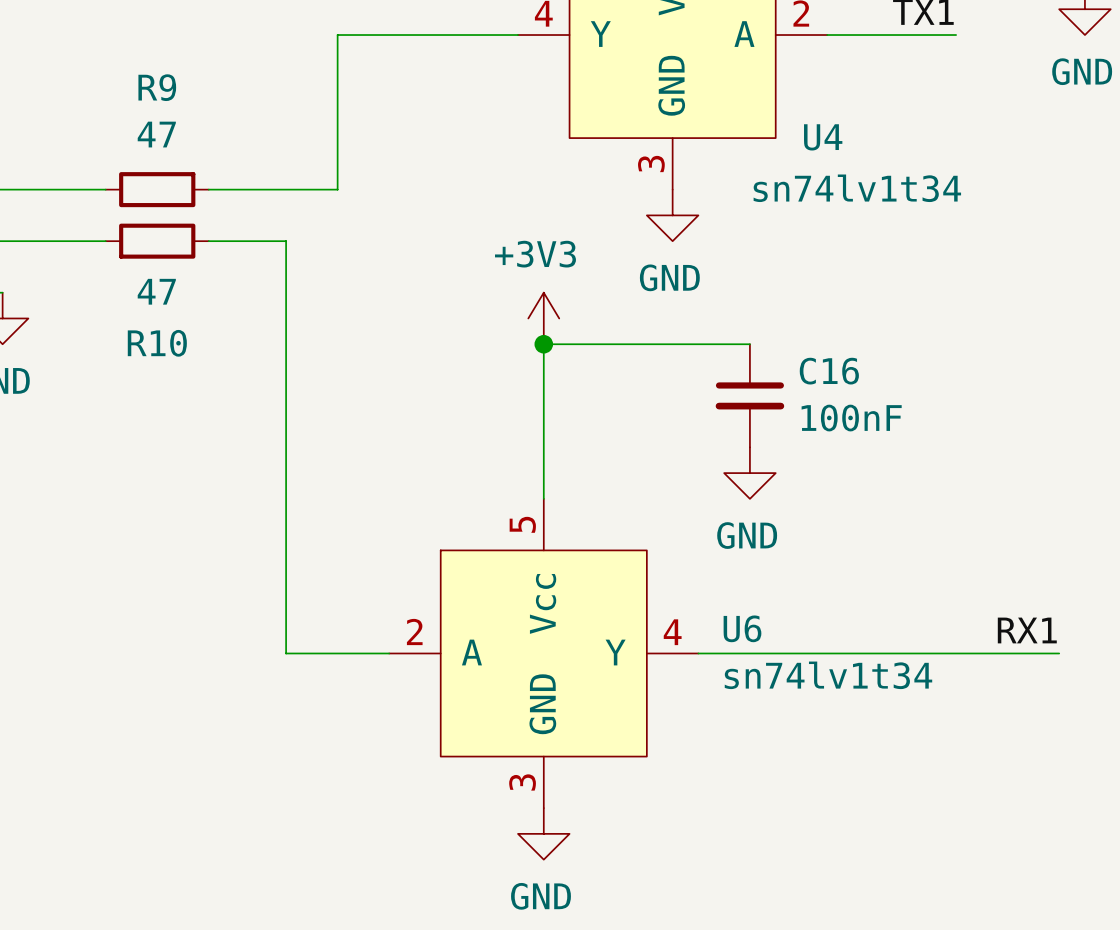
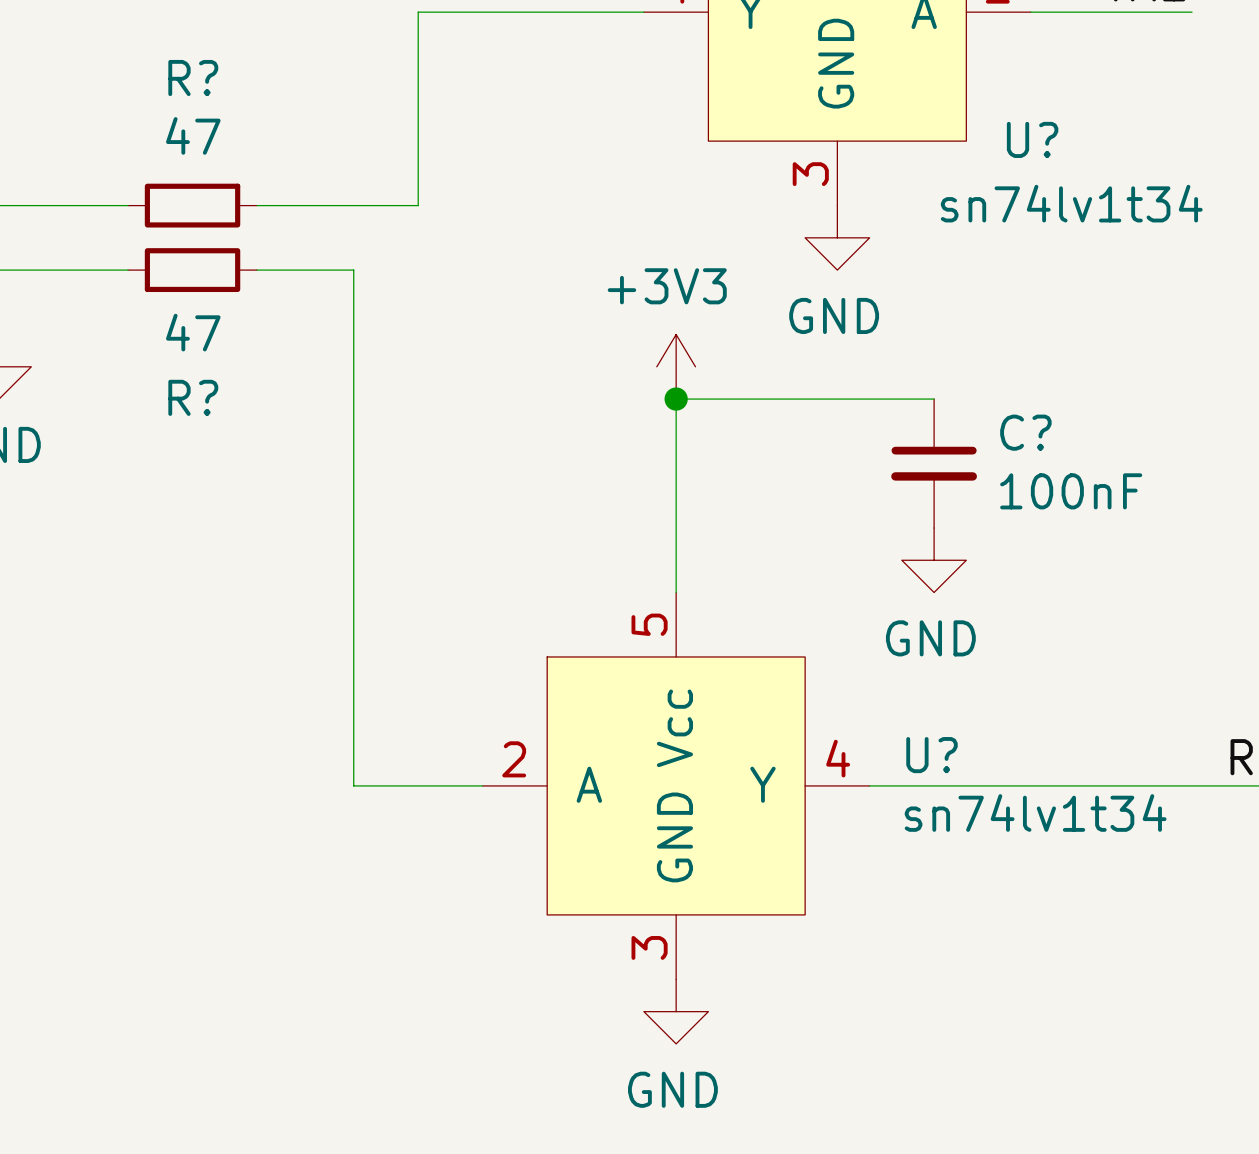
R9 name: R9 (157, 87) -> R? (193, 78)
U4 name: U4 (823, 137) -> U? (1032, 139)
R10 name: R10 (157, 343) -> R? (193, 397)
C16 name: C16 (829, 371) -> C? (1025, 432)
U6 name: U6 (742, 628) -> U? (932, 755)

